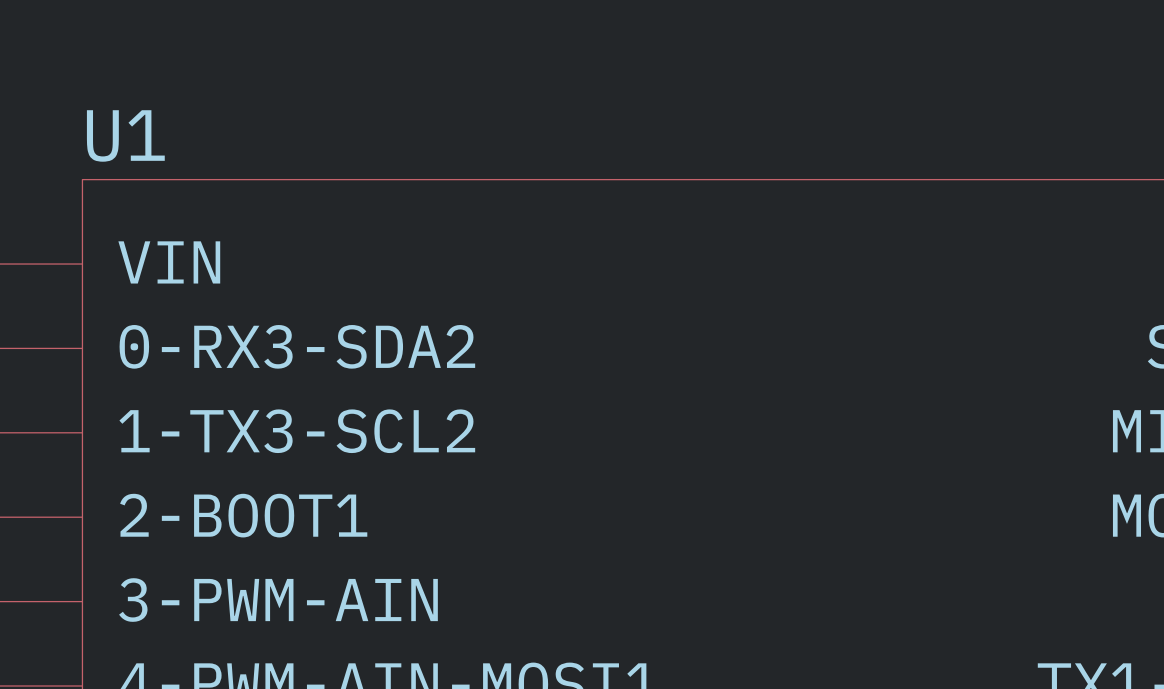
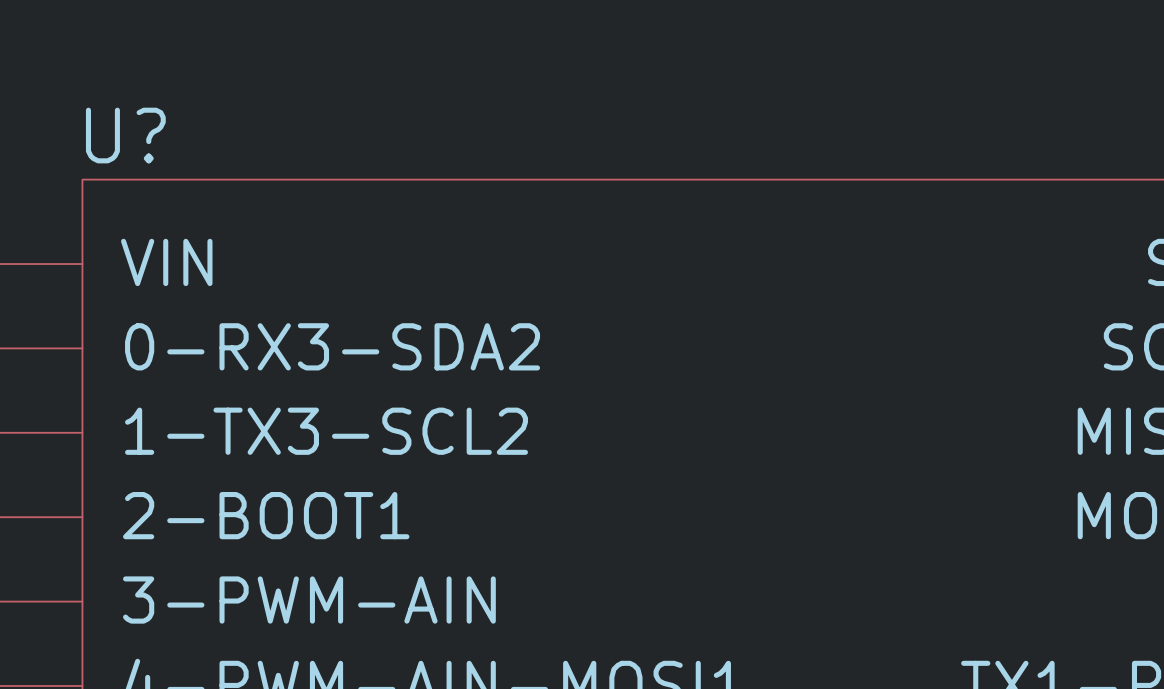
U1 name: U1 (125, 135) -> U? (125, 135)

